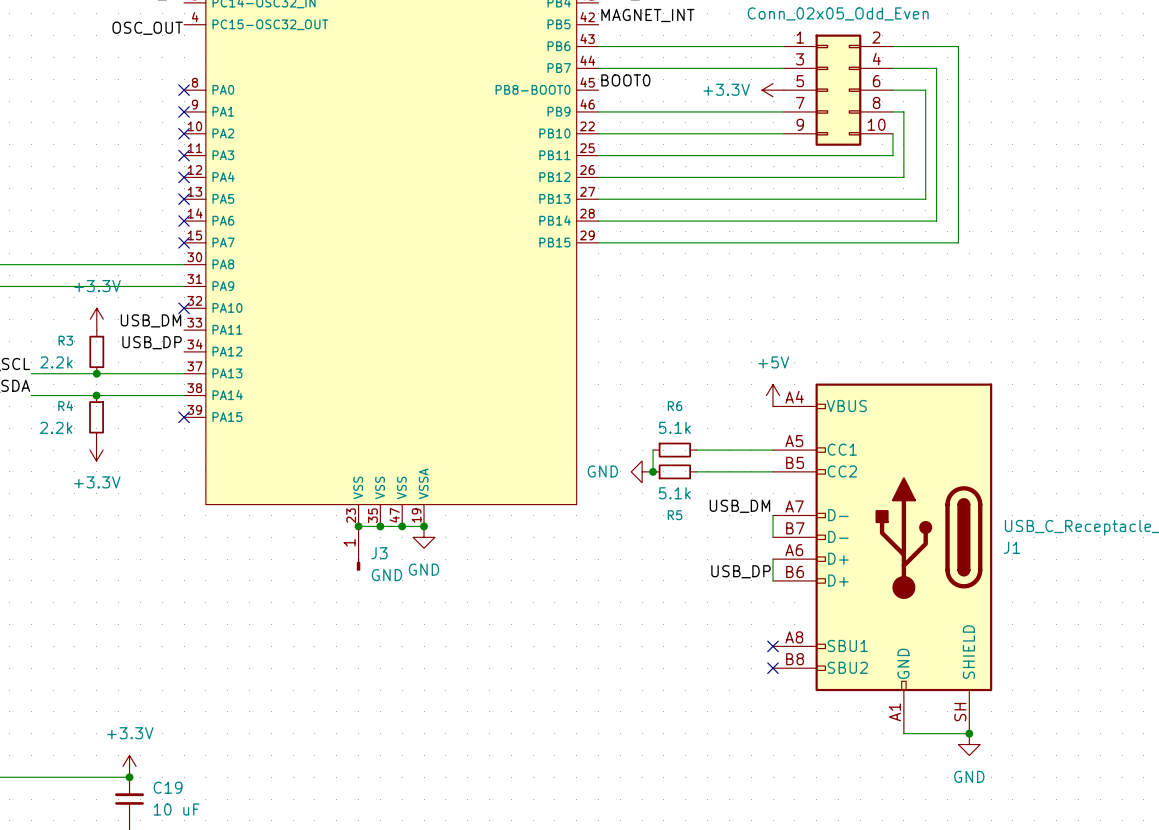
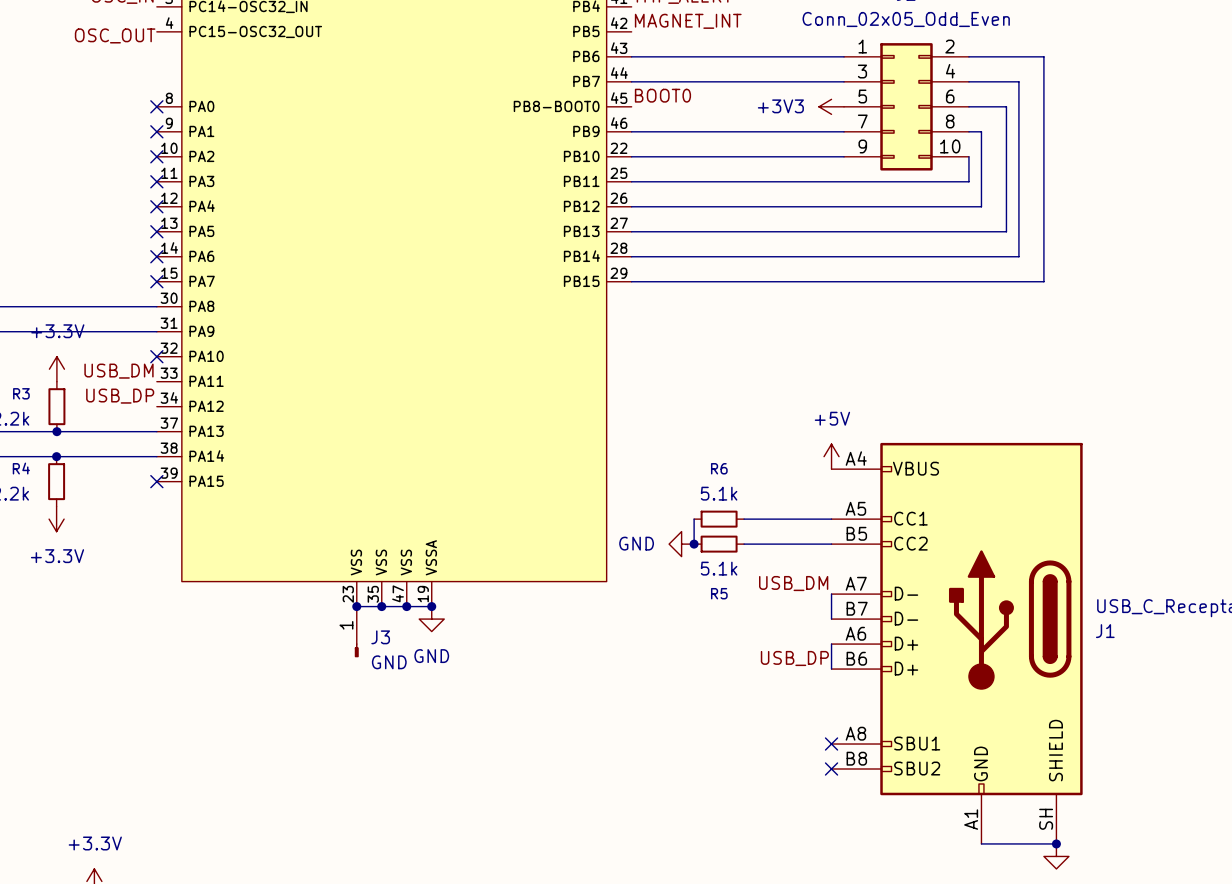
power symbol: +3.3V (773, 90) -> +3V3 (831, 106)

